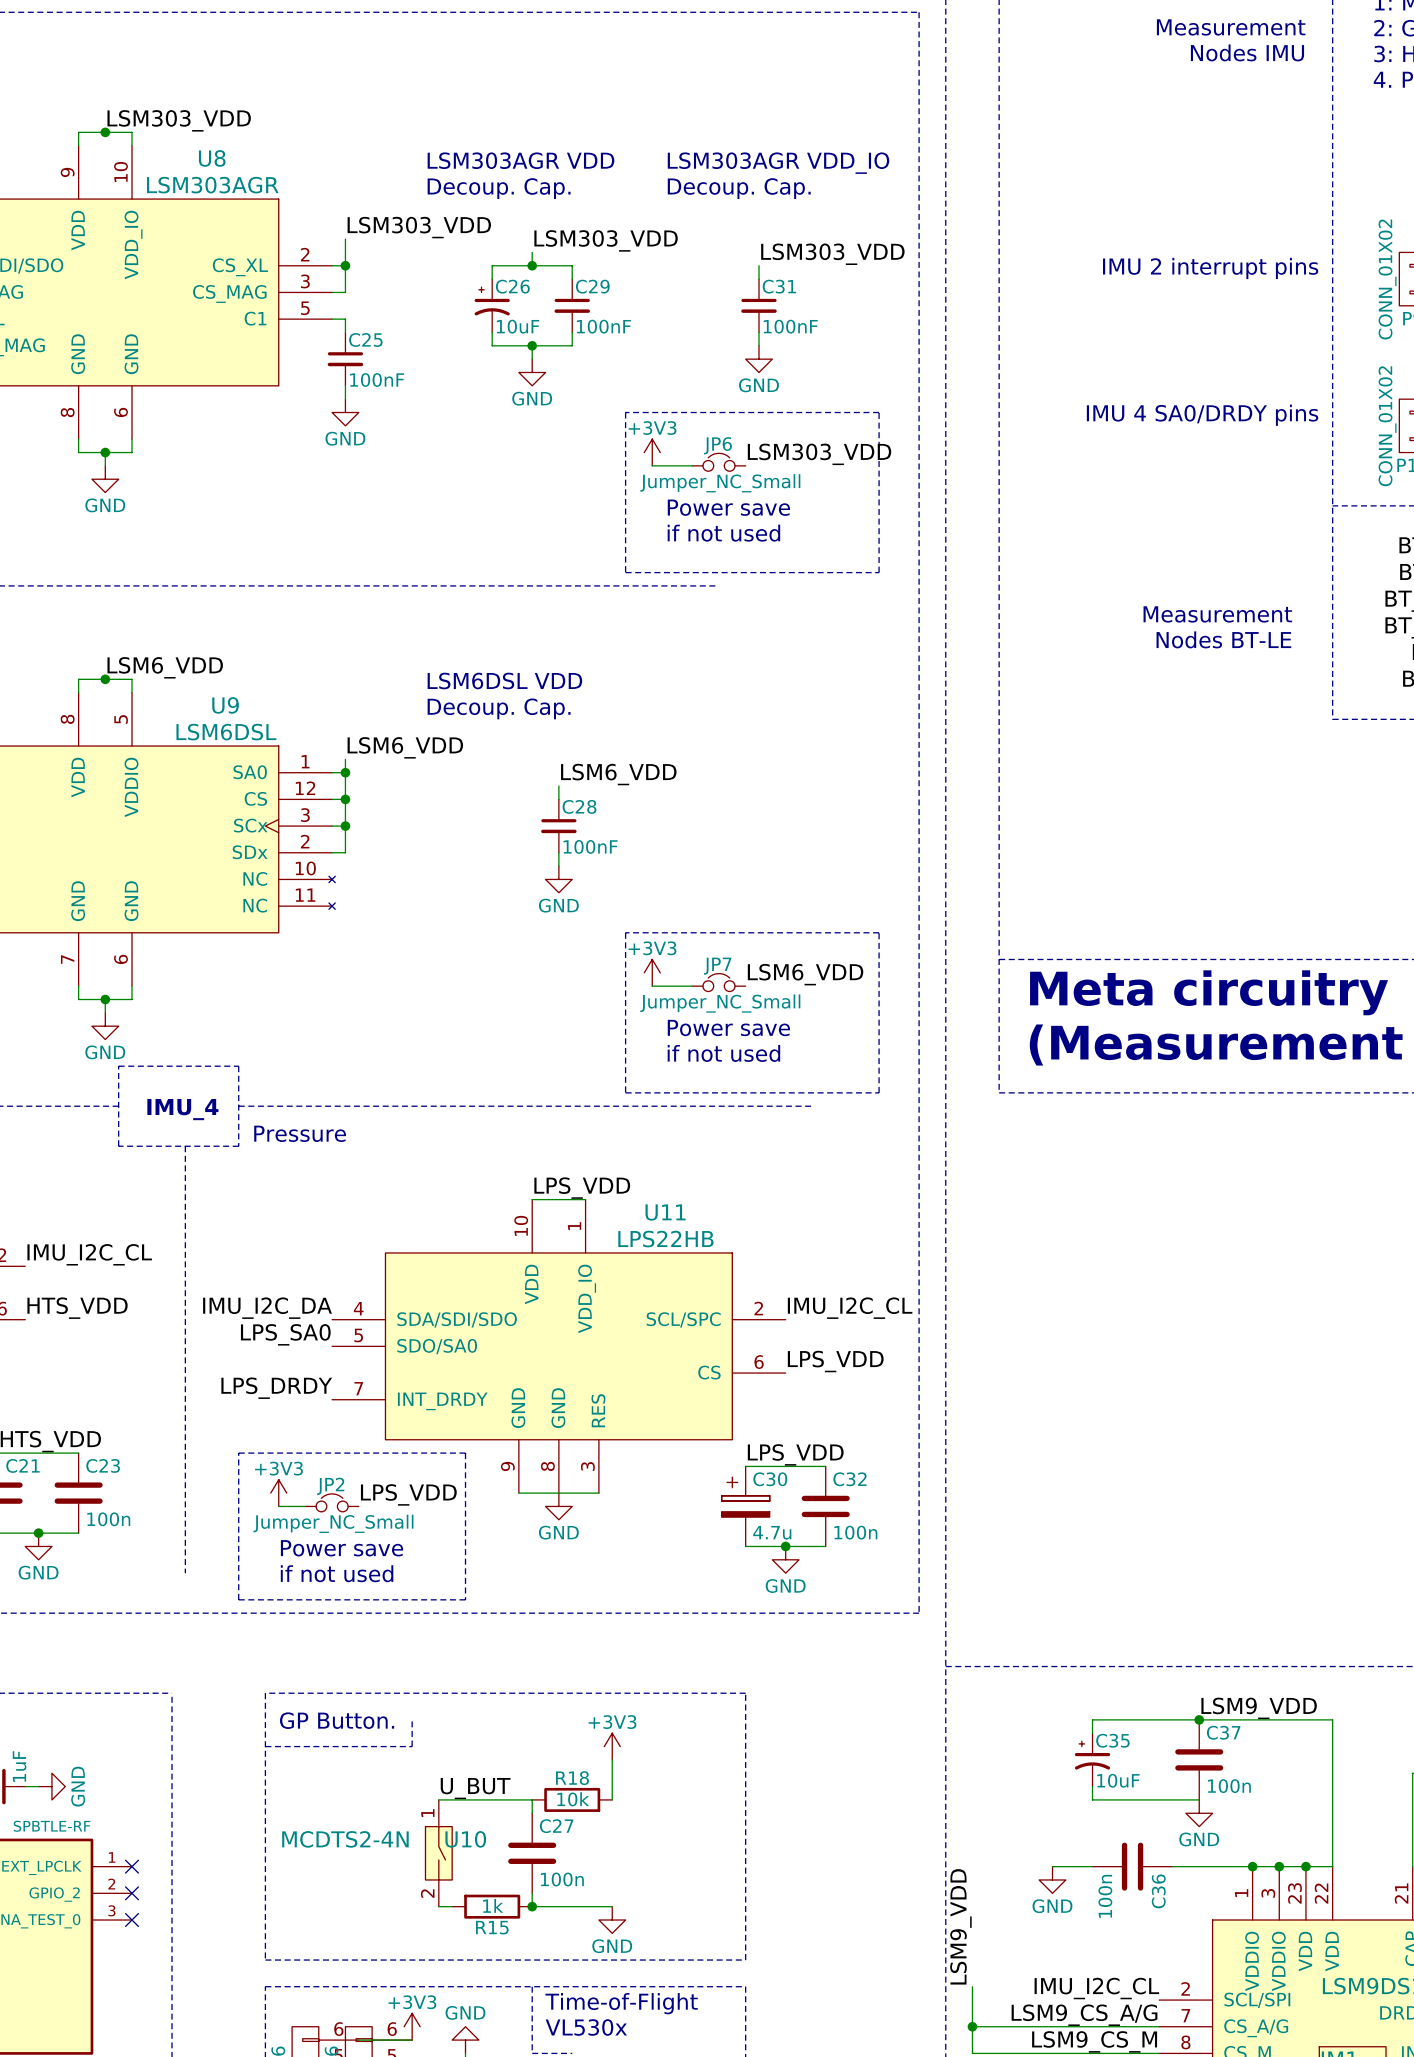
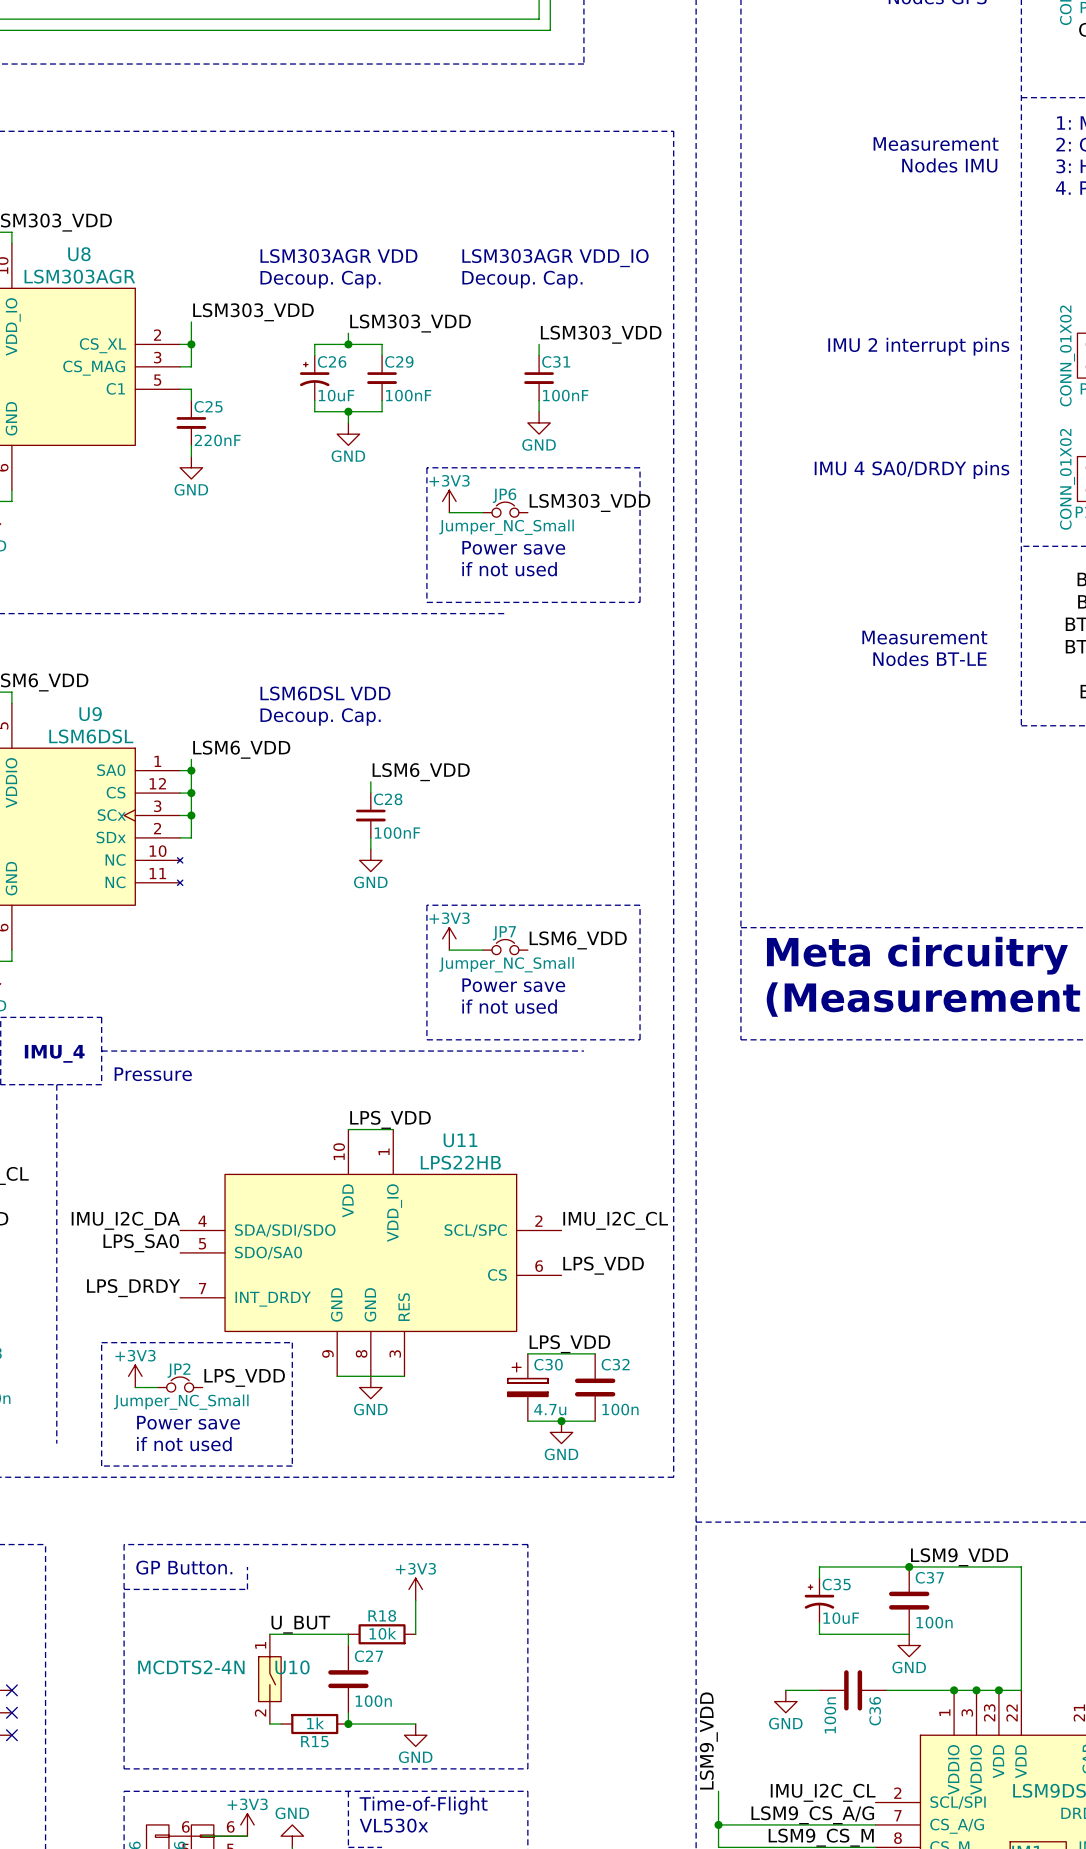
C25 value: 100nF (377, 380) -> 220nF (217, 440)

